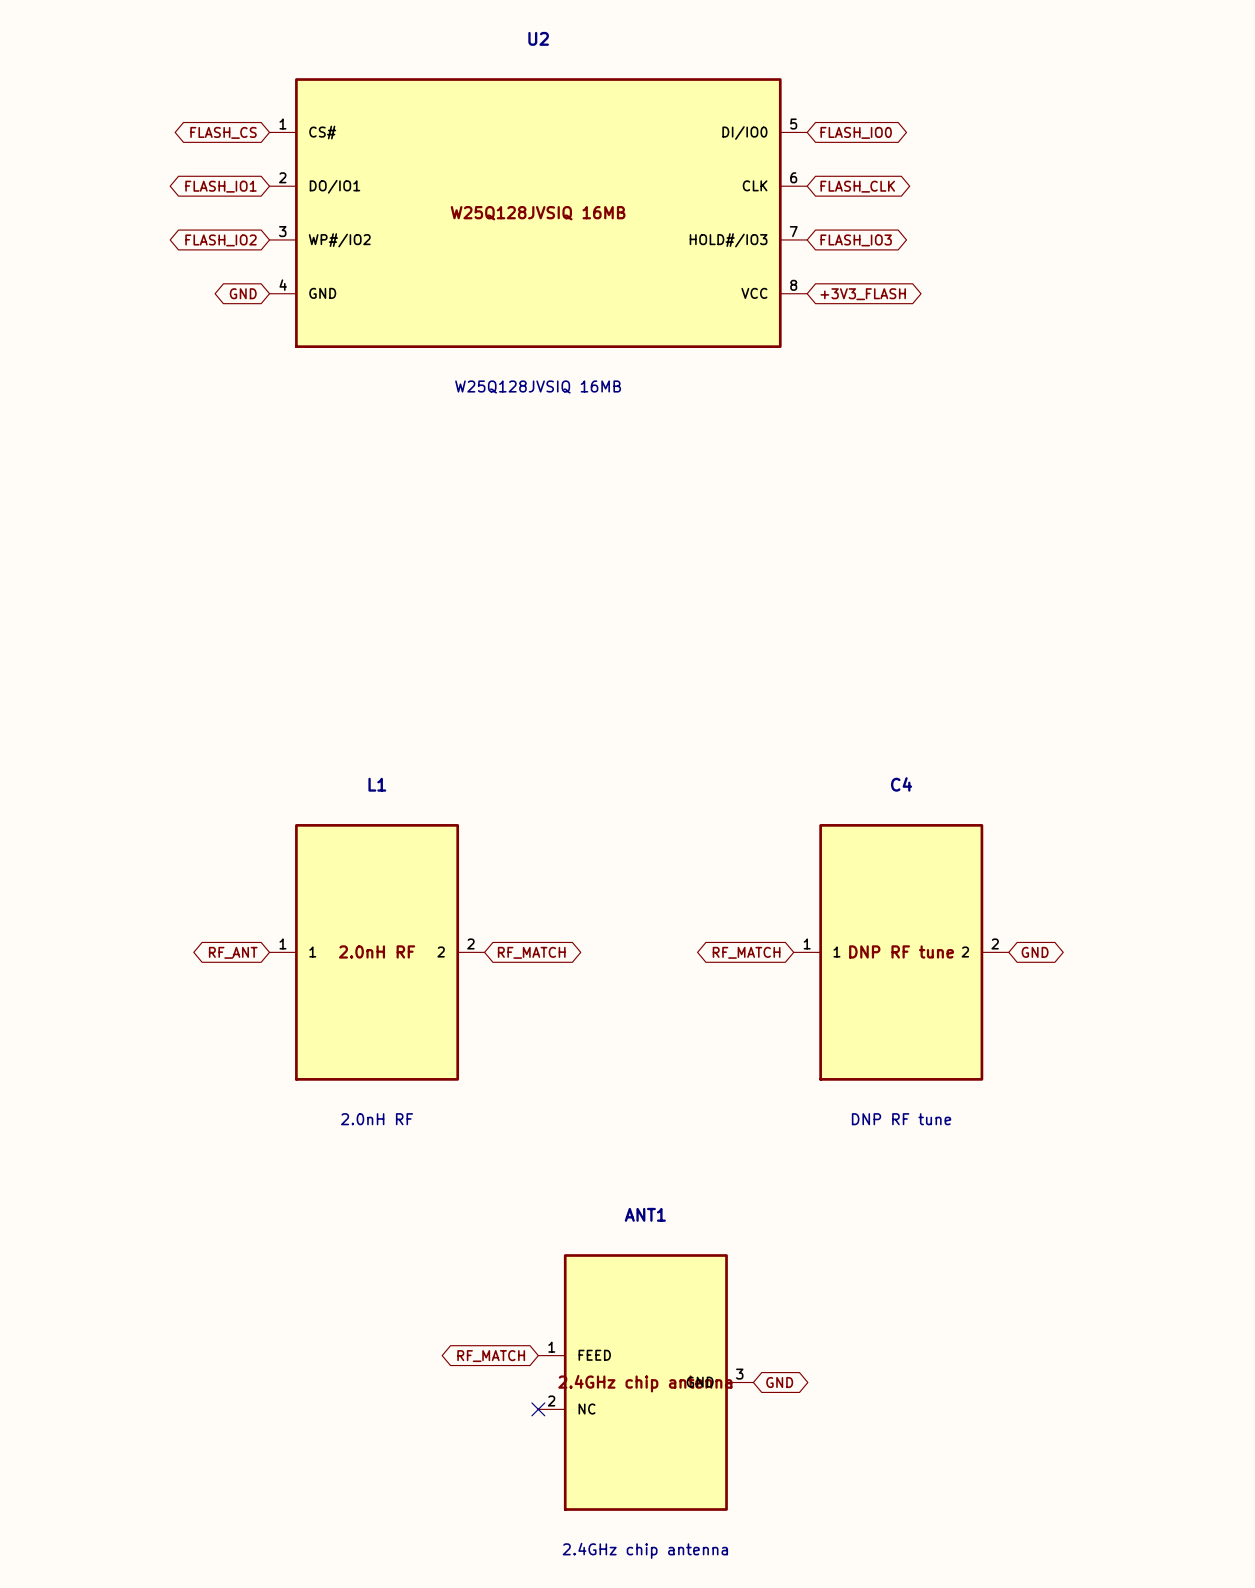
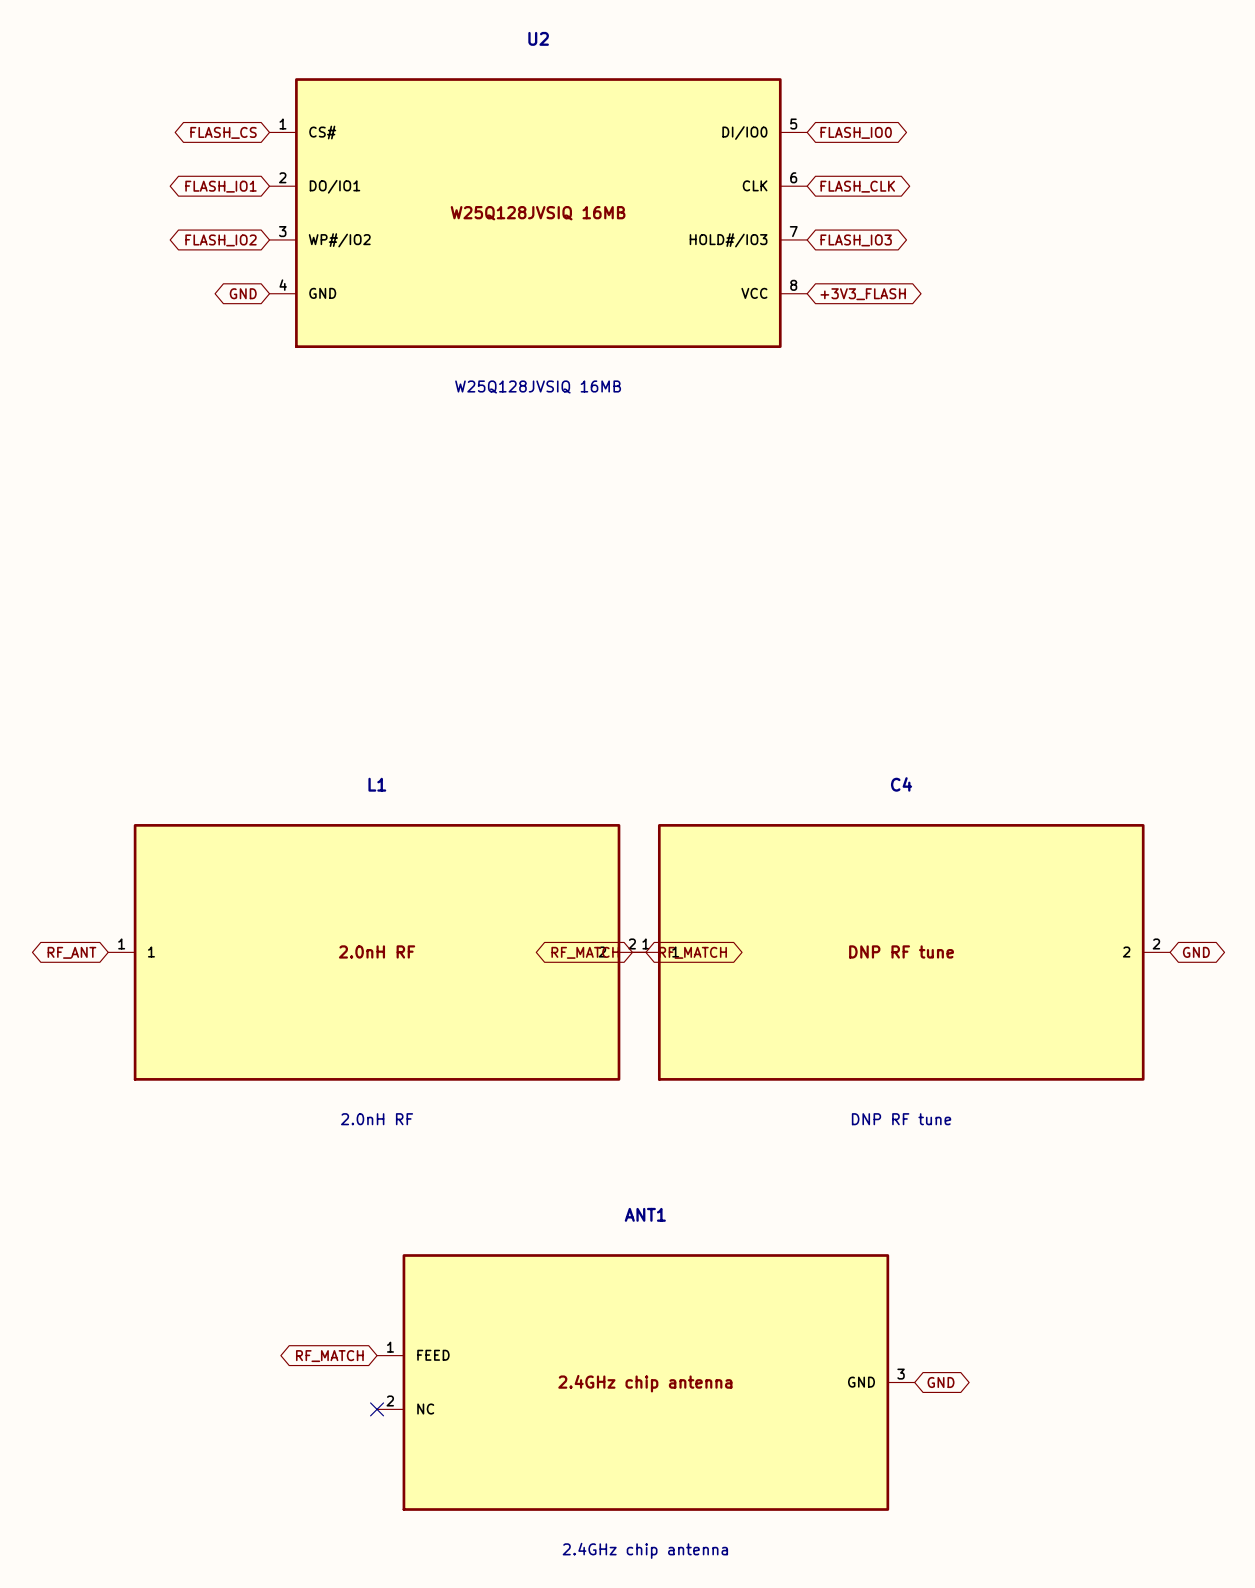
L1 symbol: [269, 824, 485, 1081] -> [108, 824, 646, 1081]
C4 symbol: [793, 824, 1009, 1081] -> [632, 824, 1171, 1081]
global label position: RF_ANT (233, 952) -> RF_ANT (71, 952)
global label rotation: 0° (531, 952) -> 180° (585, 952)
global label rotation: 0° (746, 952) -> 180° (693, 952)
global label position: GND (1035, 952) -> GND (1196, 952)
ANT1 symbol: [538, 1254, 754, 1511] -> [377, 1254, 915, 1511]
global label position: RF_MATCH (491, 1356) -> RF_MATCH (329, 1356)
global label position: GND (779, 1382) -> GND (941, 1382)
no-connect mark: none -> (377, 1409)
no-connect mark: (538, 1409) -> none

